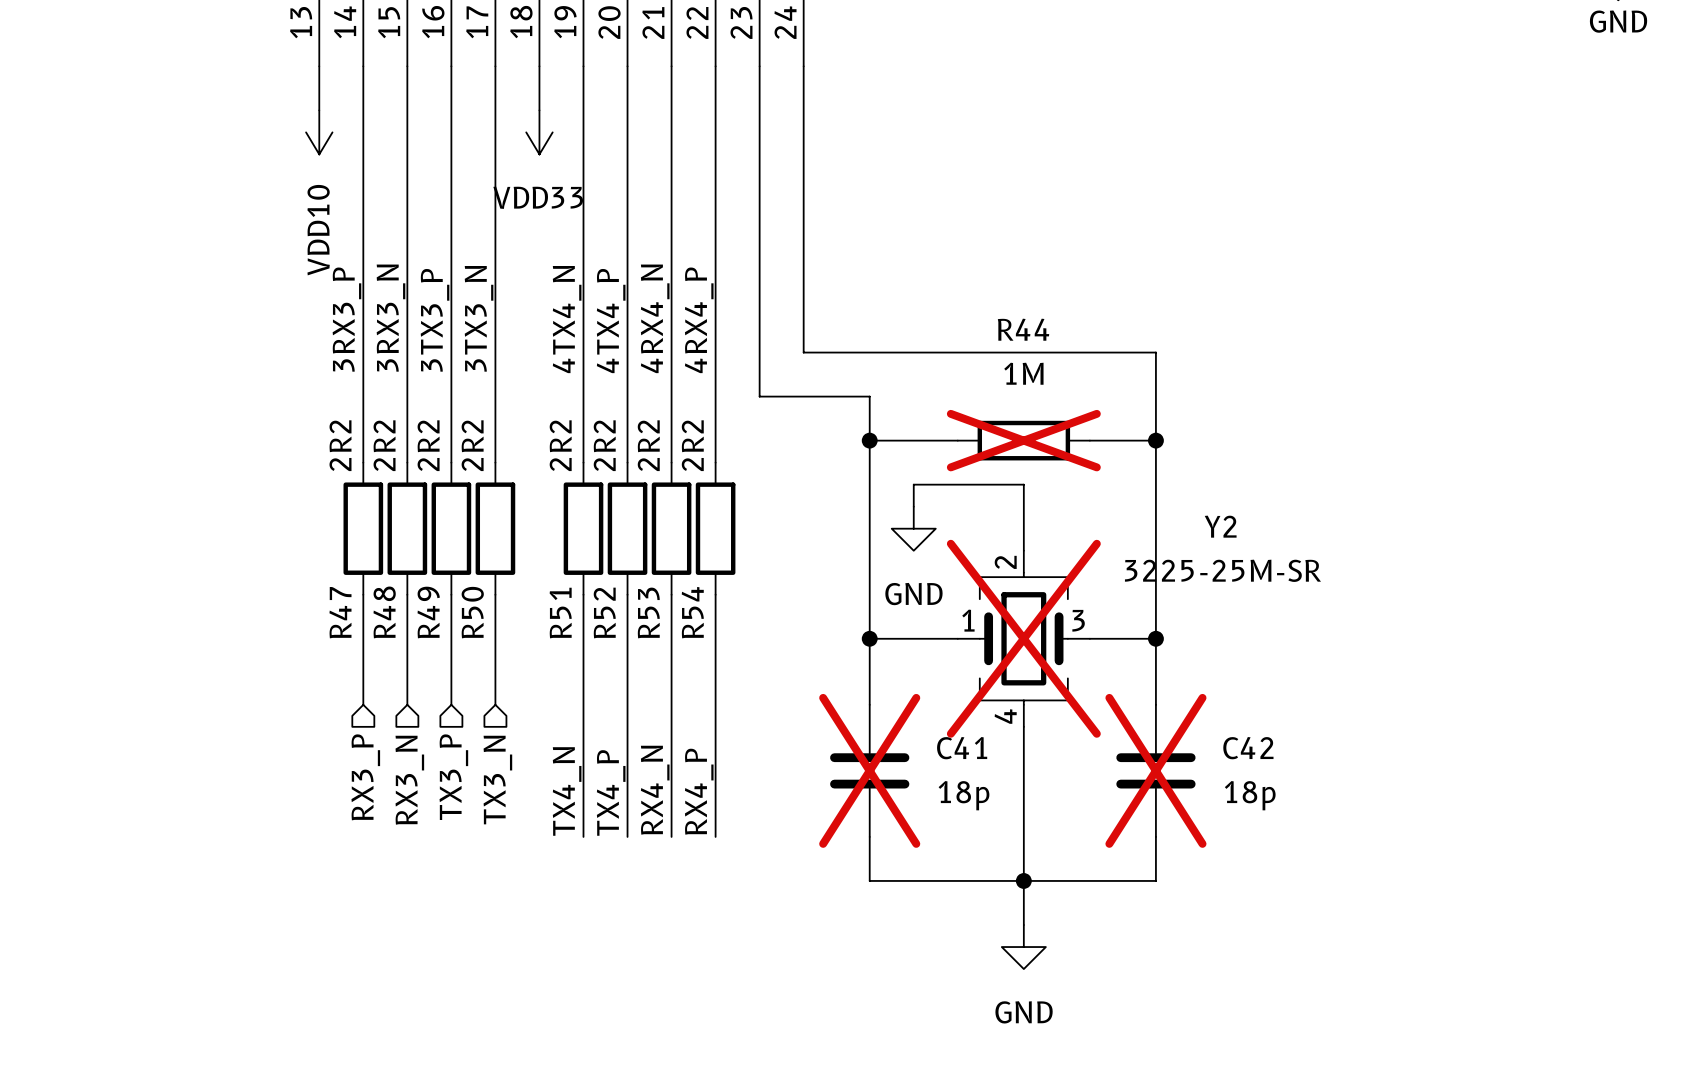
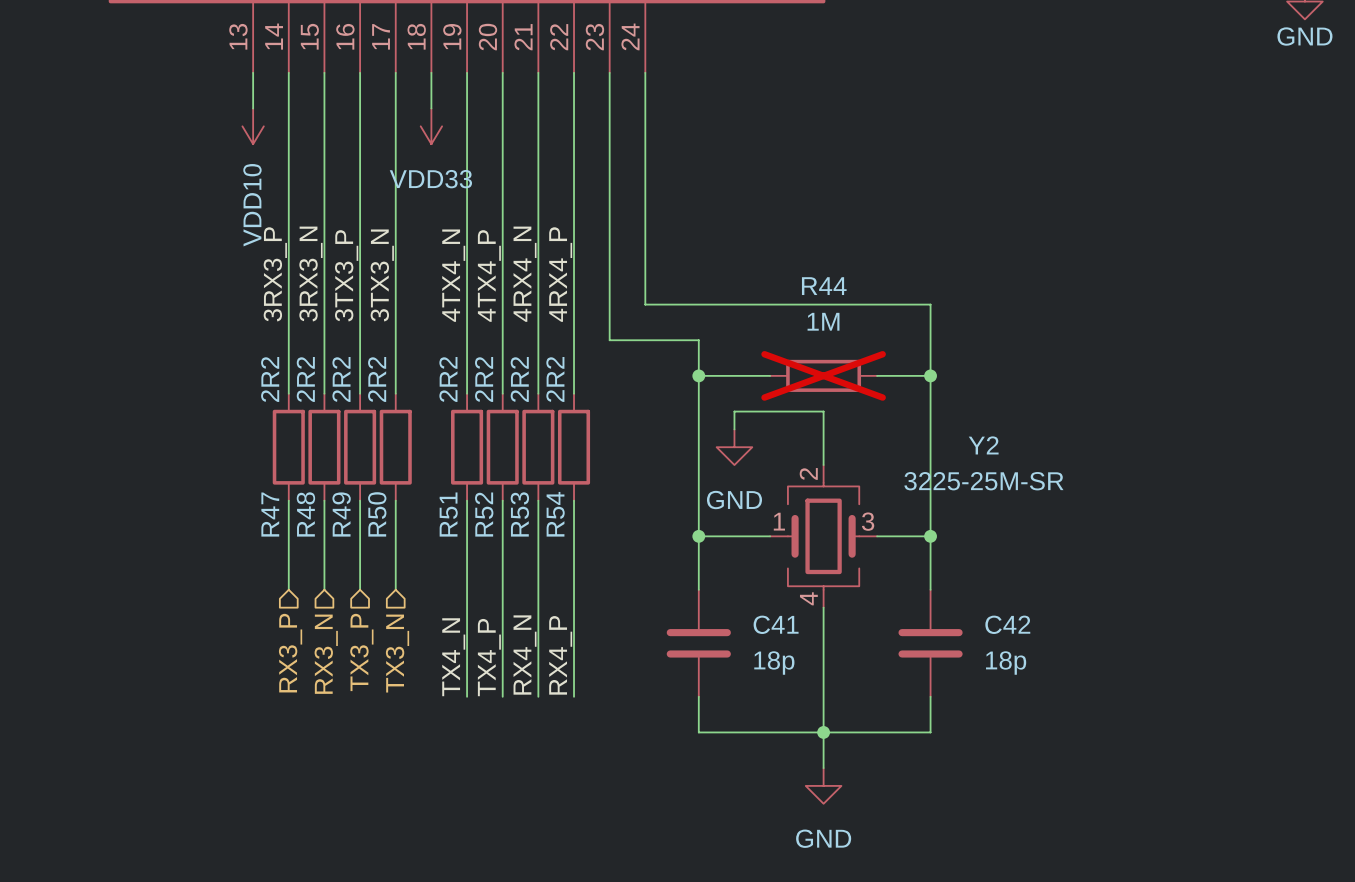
Y2 do-not-place cross: (1023, 638) -> none
C41 do-not-place cross: (869, 770) -> none
C42 do-not-place cross: (1155, 770) -> none

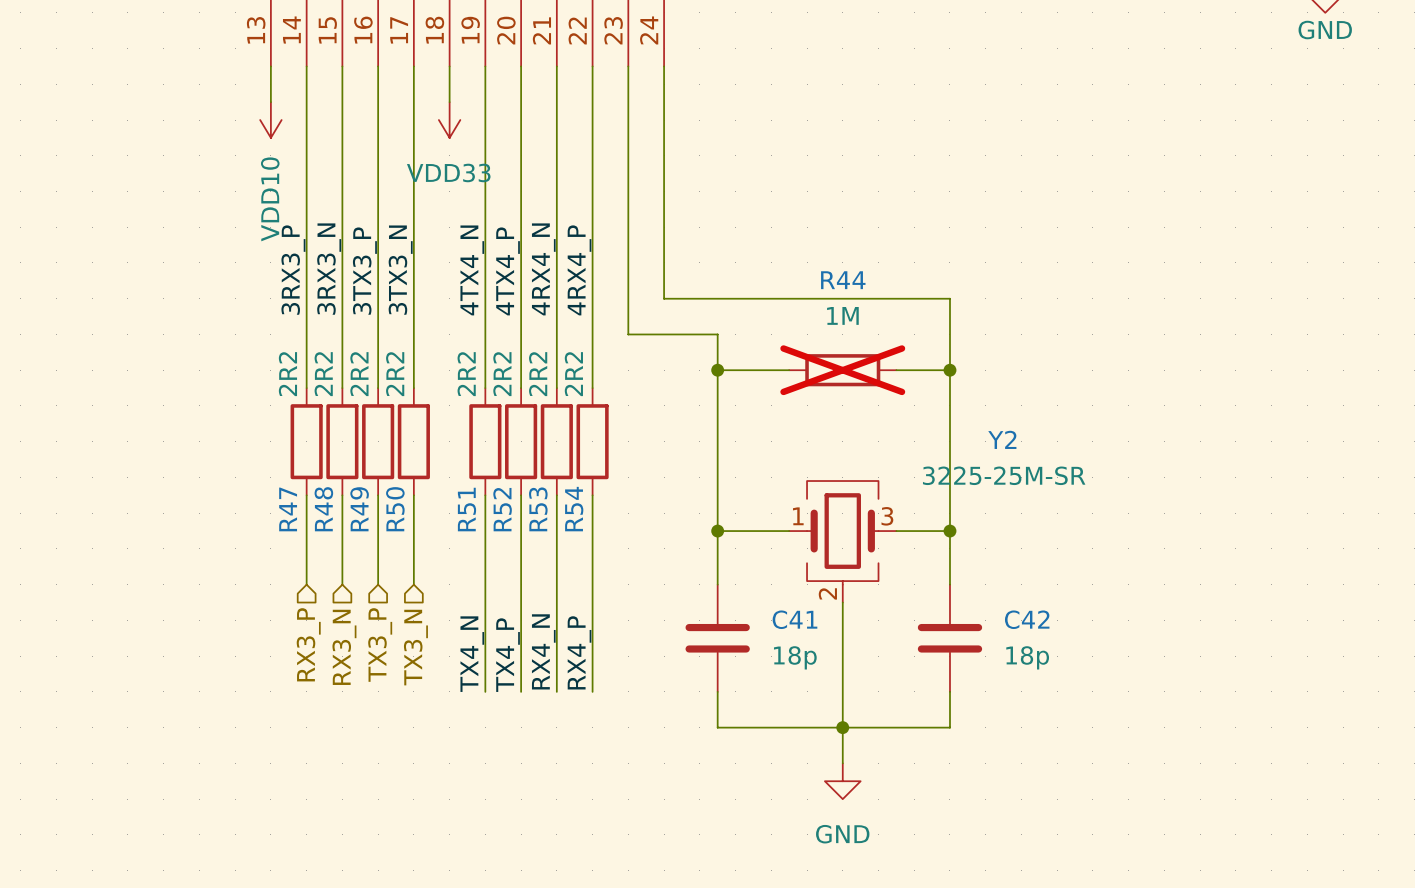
wire: (734, 429) (734, 411) (823, 411) (823, 465) -> none
power symbol: GND (734, 447) -> none
Y2 symbol: [770, 465, 878, 608] -> [789, 481, 897, 603]

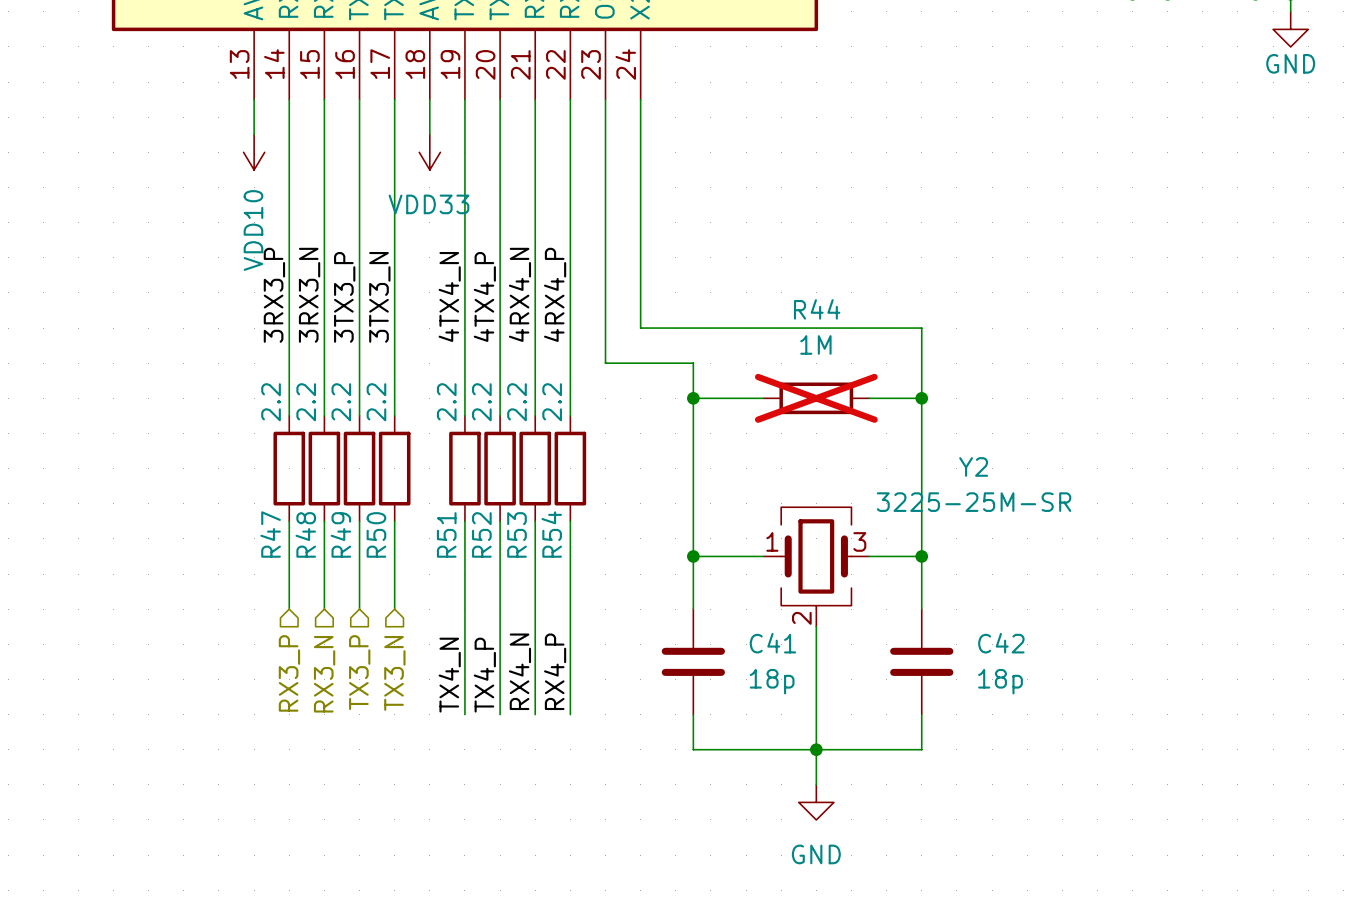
R47 value: 2R2 (287, 374) -> 2.2 (271, 402)
R48 value: 2R2 (323, 374) -> 2.2 (306, 402)
R49 value: 2R2 (359, 374) -> 2.2 (341, 402)
R50 value: 2R2 (395, 374) -> 2.2 (376, 402)
R51 value: 2R2 (466, 374) -> 2.2 (446, 402)
R52 value: 2R2 (502, 374) -> 2.2 (481, 402)
R53 value: 2R2 (538, 374) -> 2.2 (517, 402)
R54 value: 2R2 (573, 374) -> 2.2 (552, 402)

